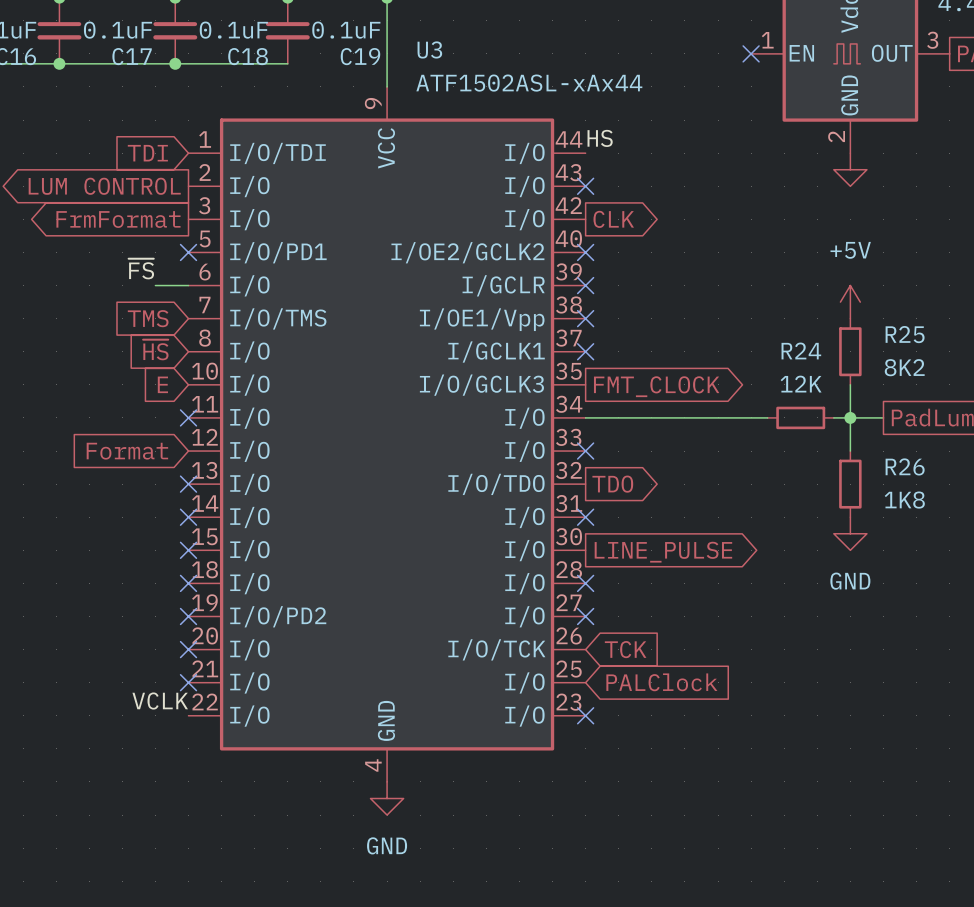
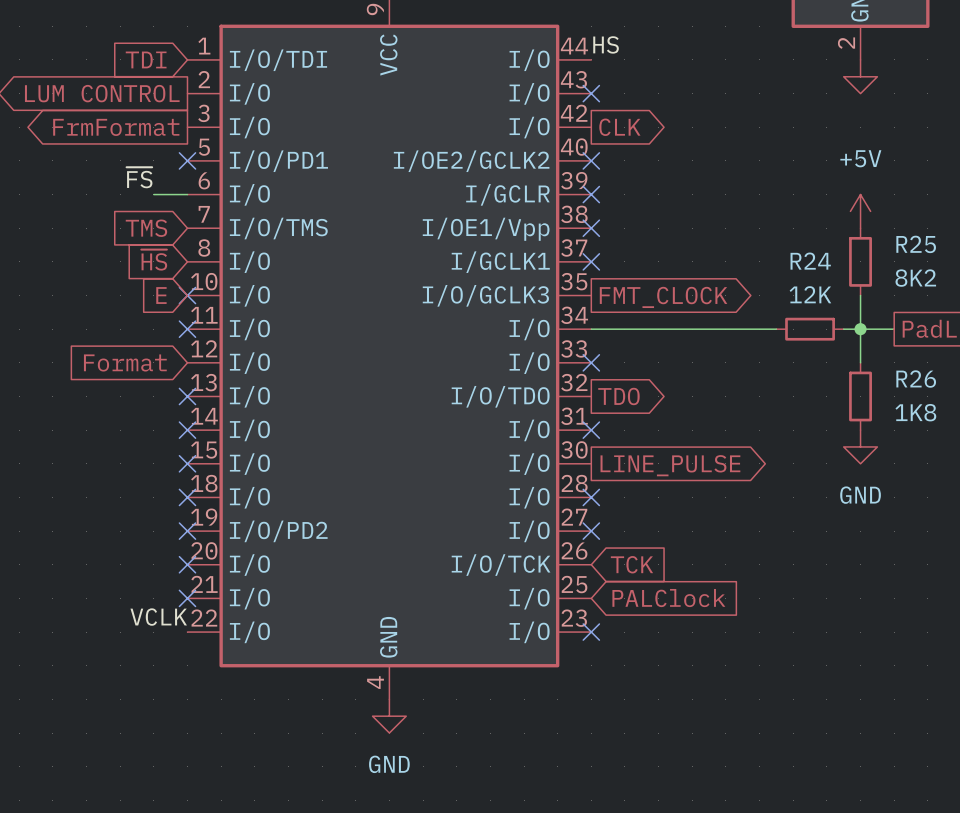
no-connect mark: none -> (187, 295)

